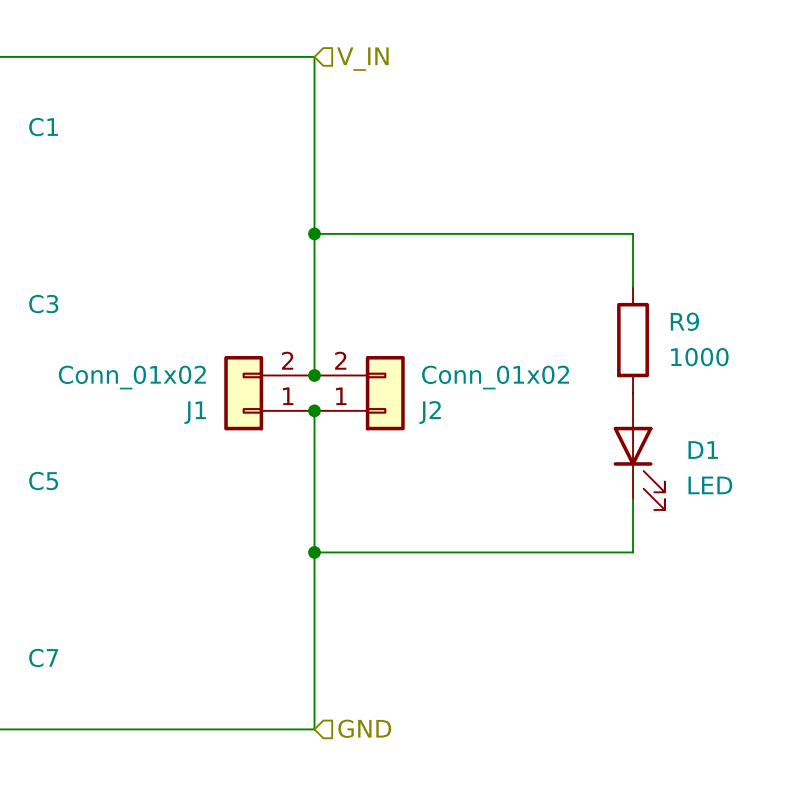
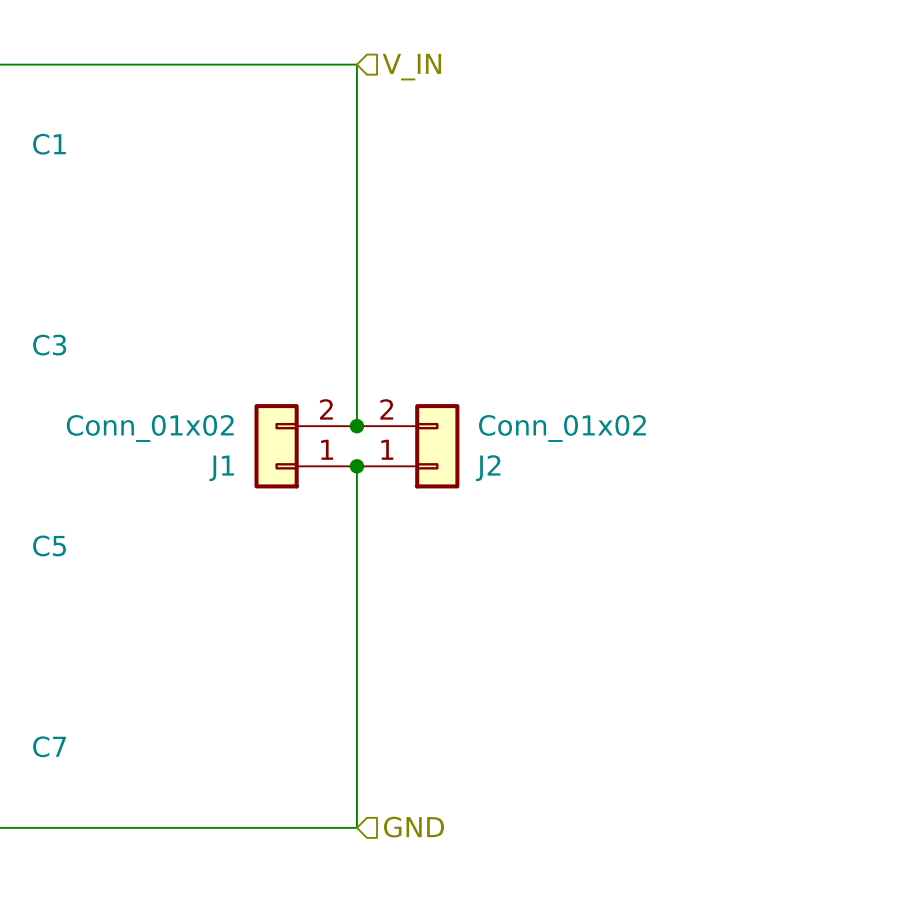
wire: (314, 233) (633, 233) (633, 286) -> none
junction: (314, 233) -> none
R9: 1000 (633, 340) -> none
D1: LED (639, 451) -> none
wire: (633, 499) (633, 552) (314, 552) -> none
junction: (314, 552) -> none

